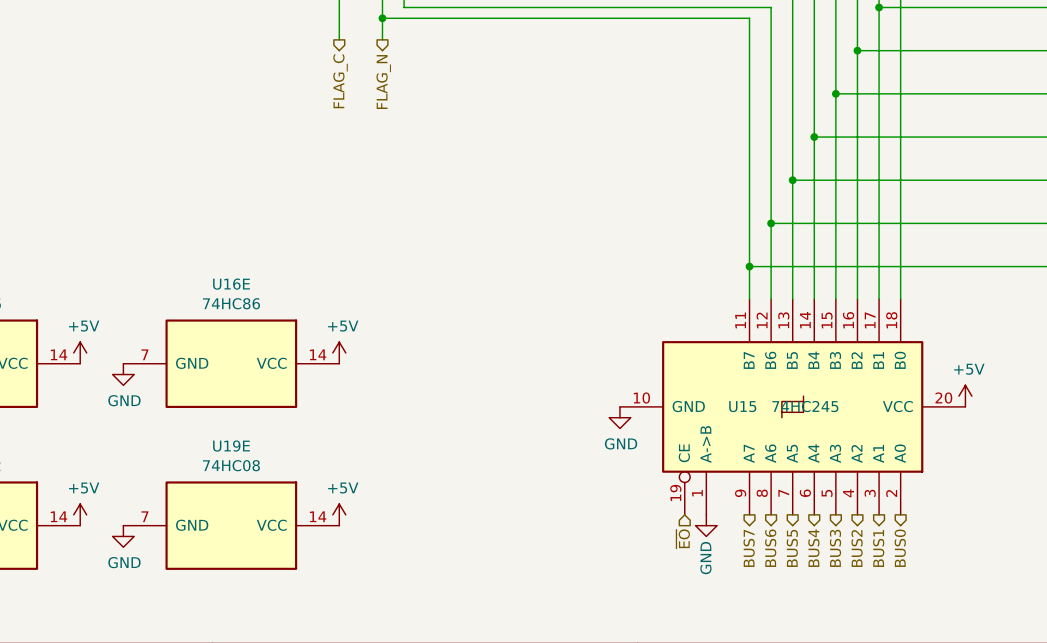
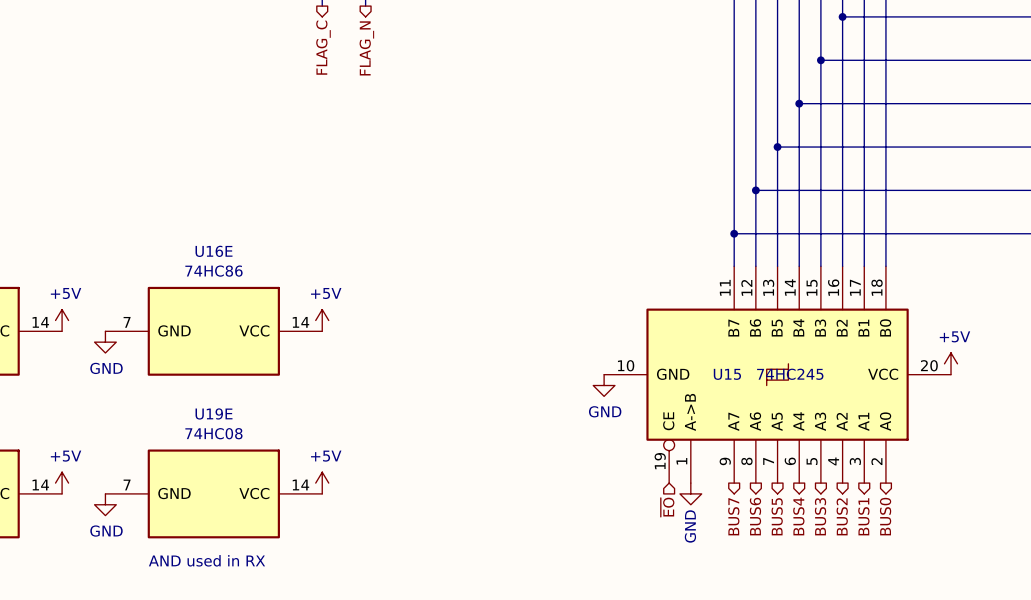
text: none -> AND used in RX (206, 560)

